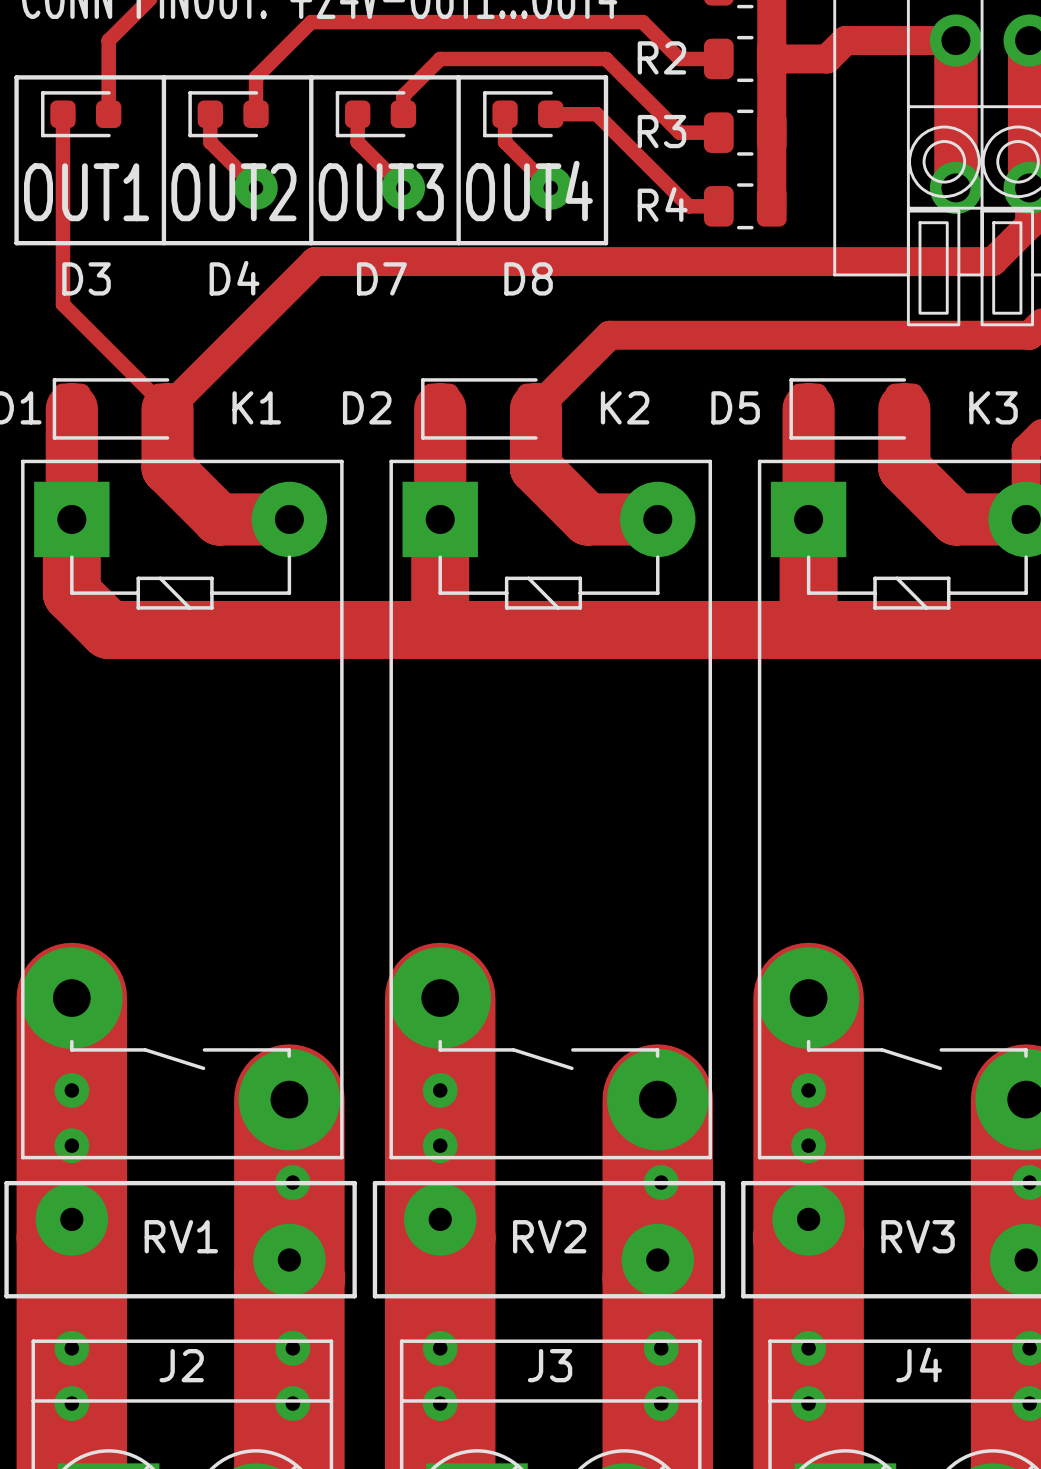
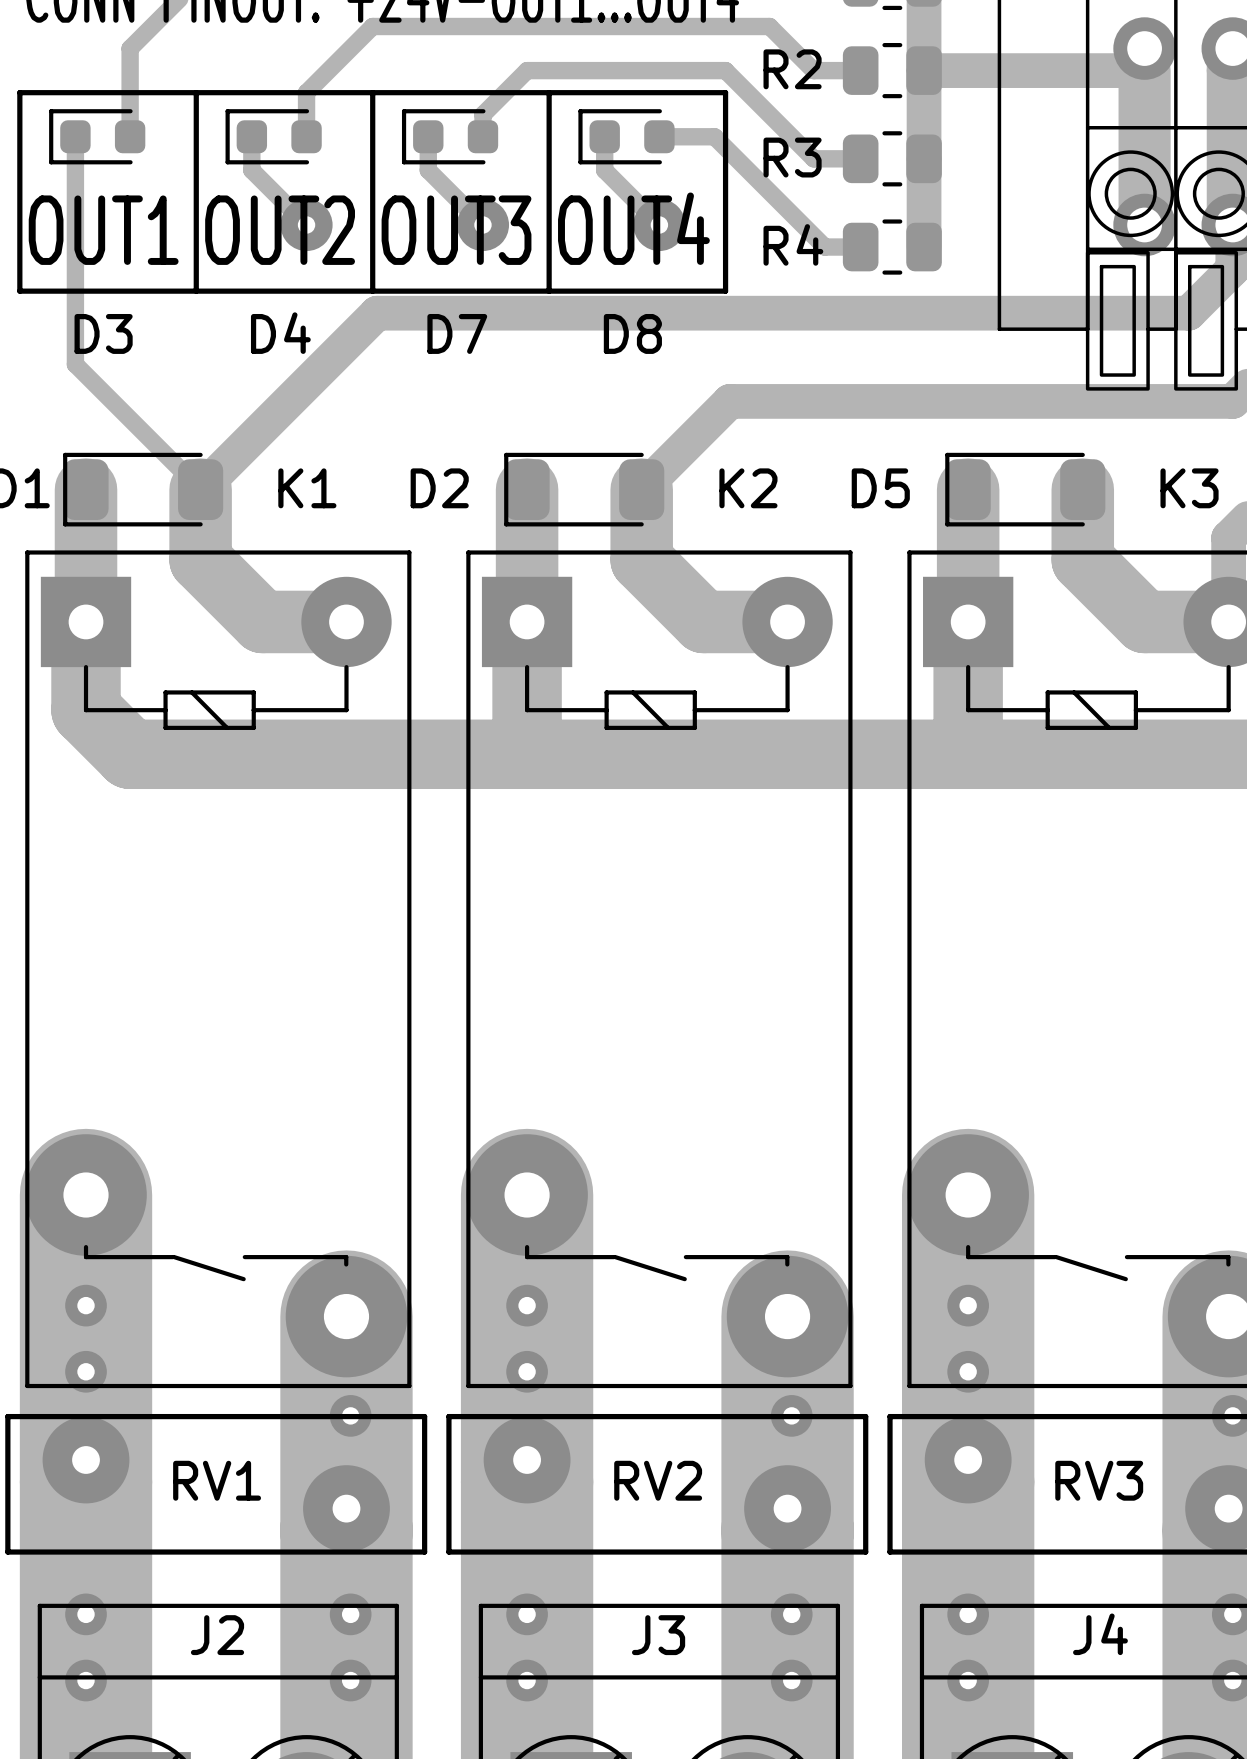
track: (827, 58) (845, 40) (955, 40) (955, 58) -> (990, 70) (1144, 70)

